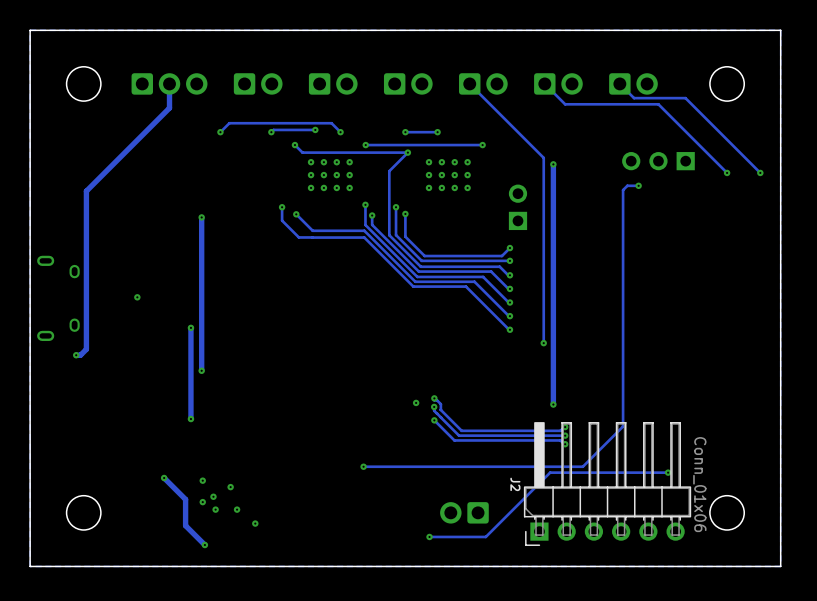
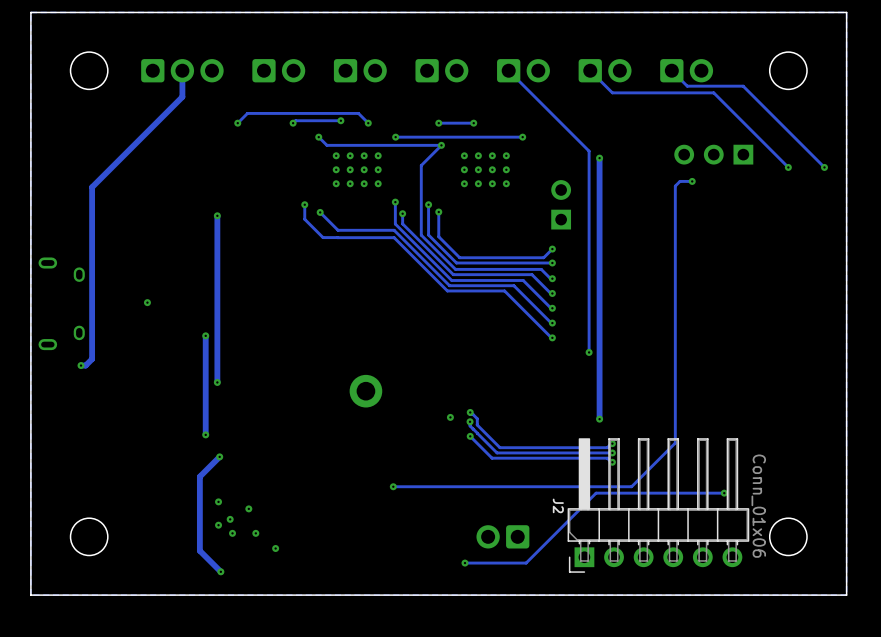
part: none -> (365, 391)
track: (164, 477) (185, 499) -> (219, 456) (199, 476) (199, 522)
via position: (164, 477) -> (219, 456)

